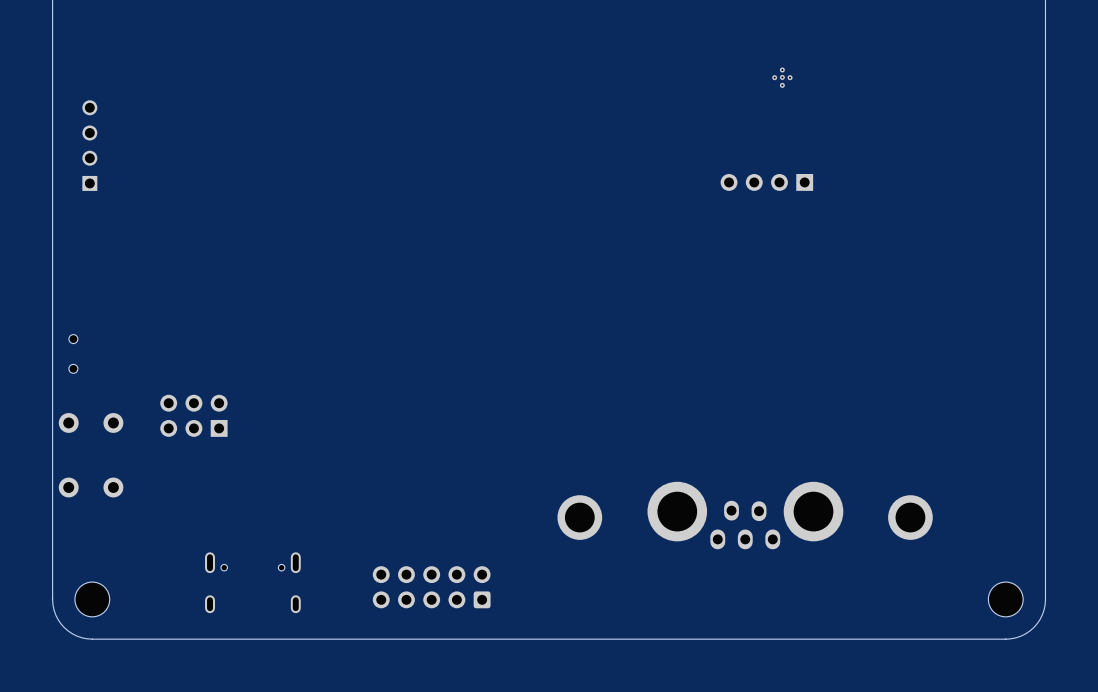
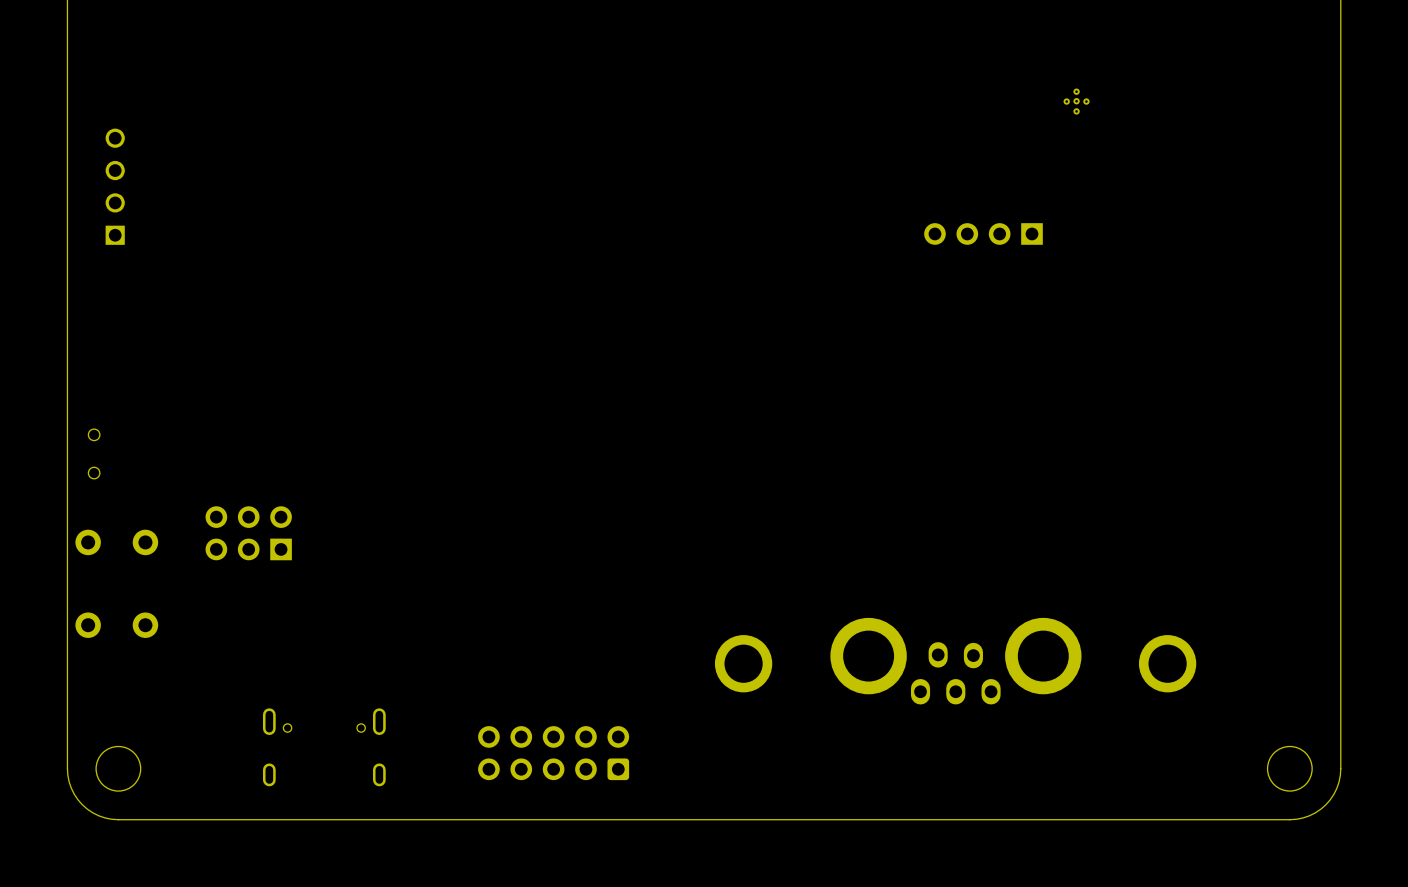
part position: (782, 77) -> (1076, 101)

